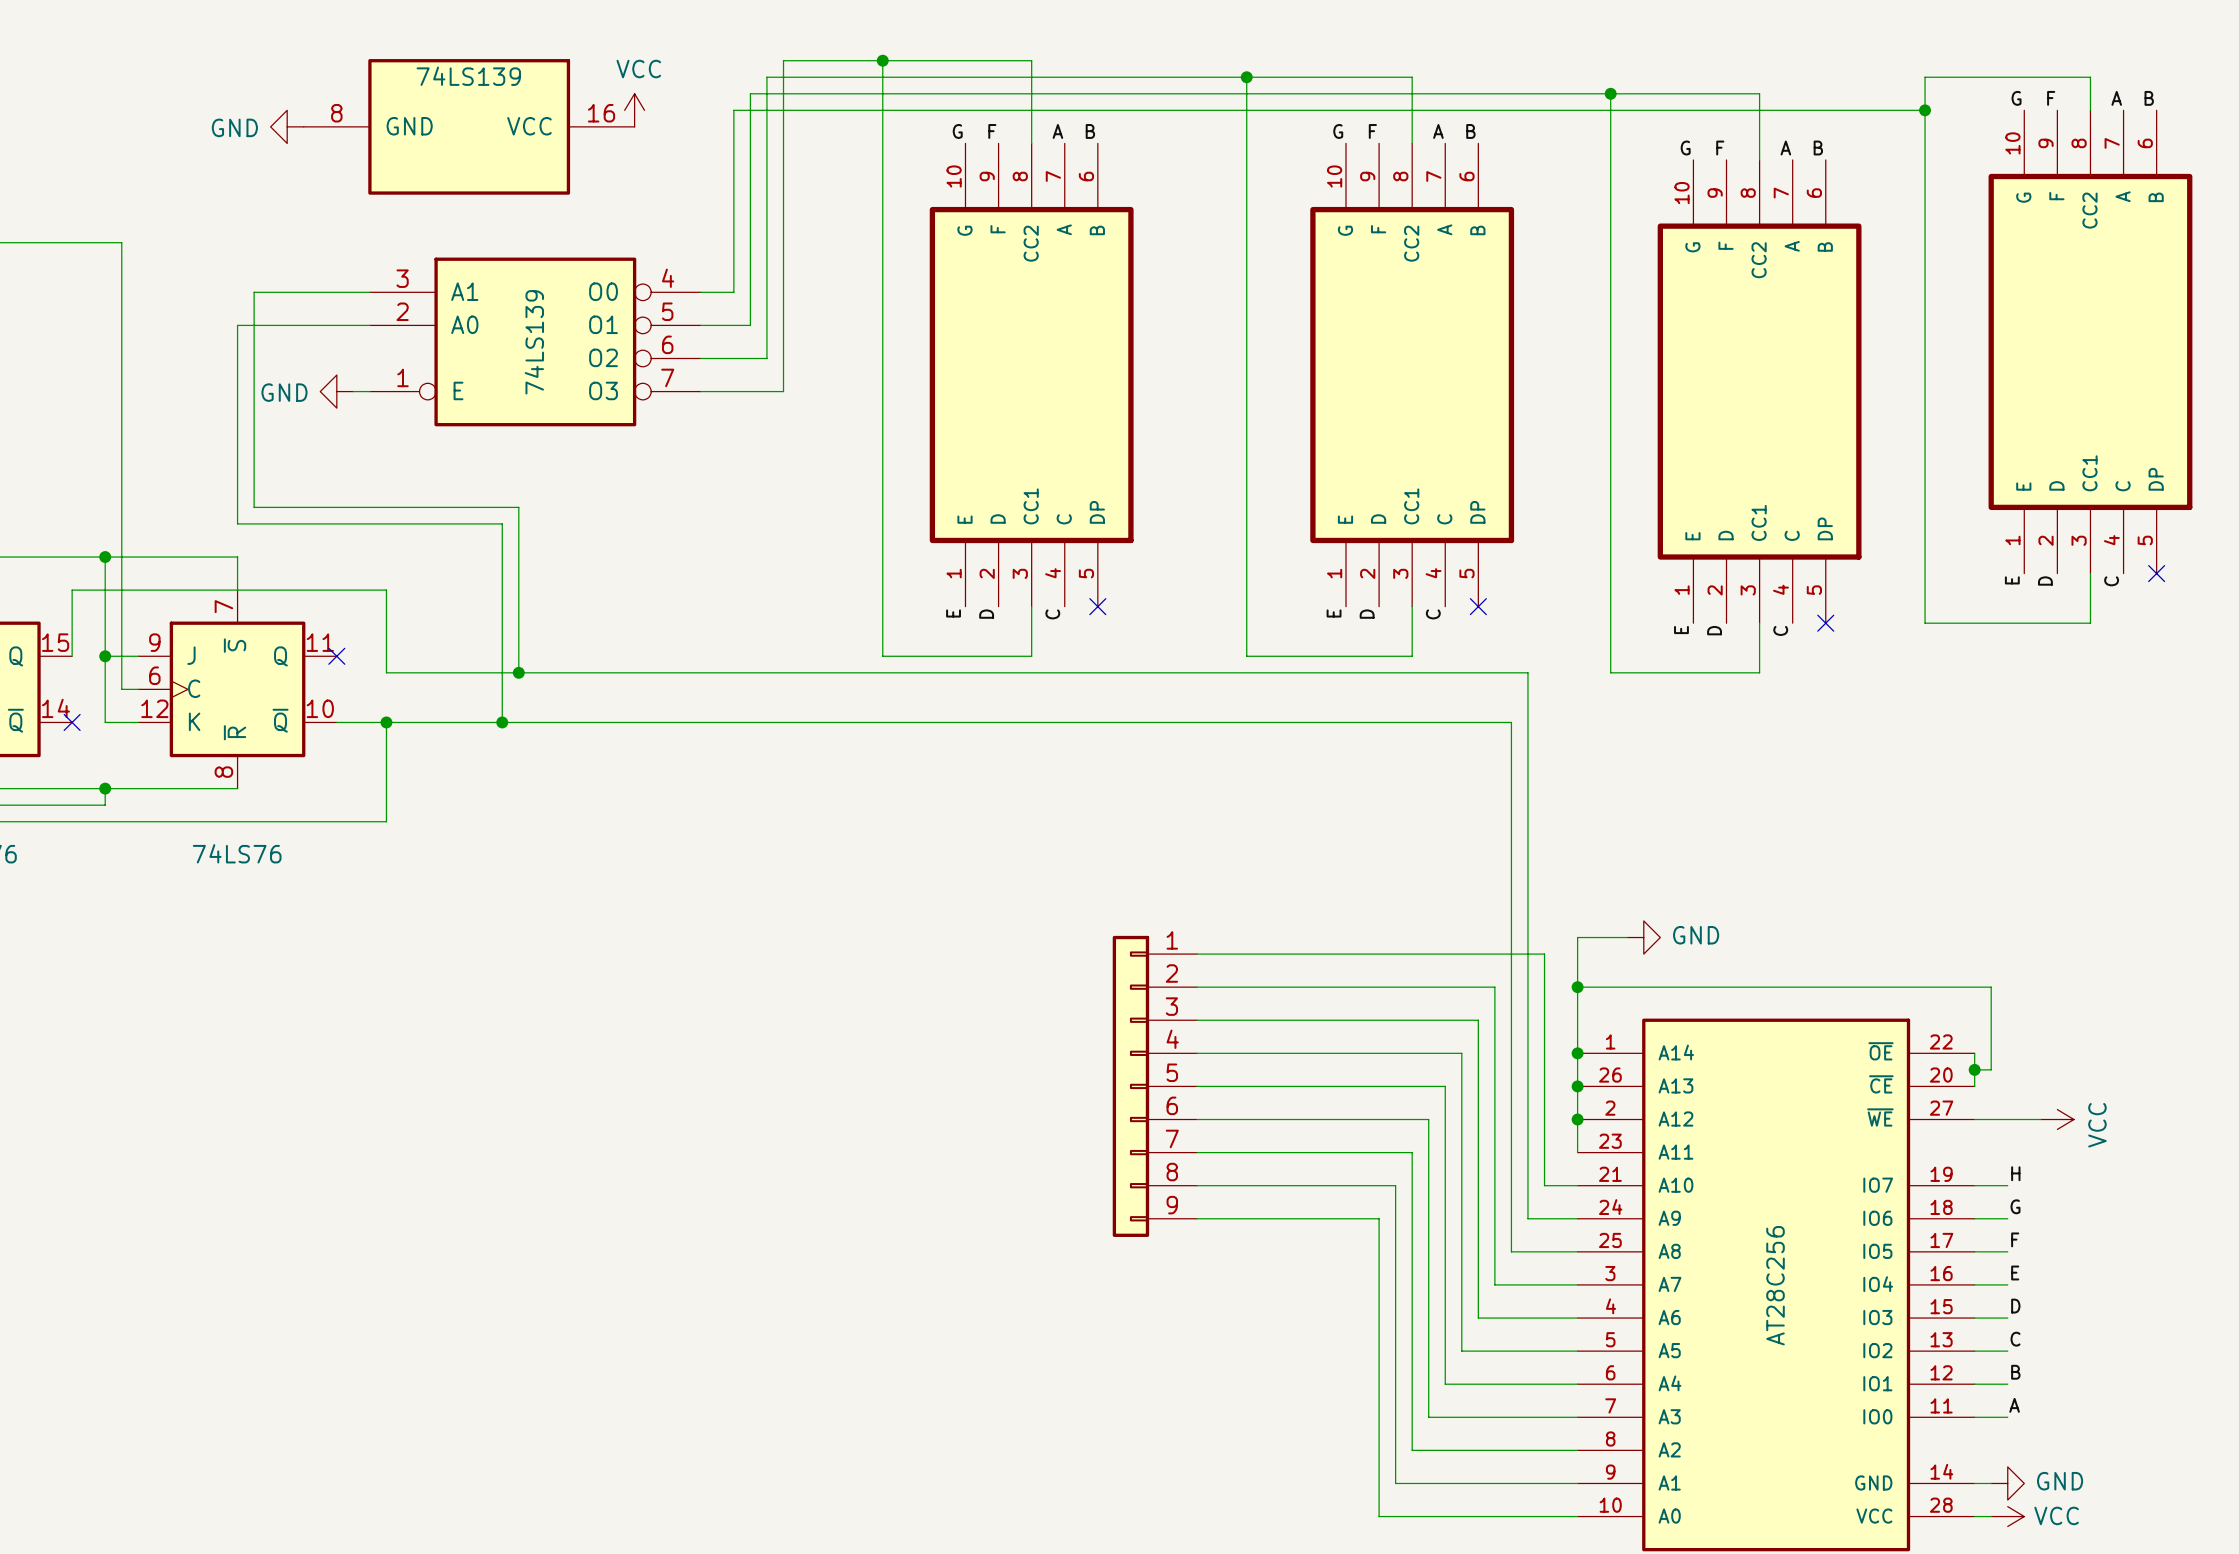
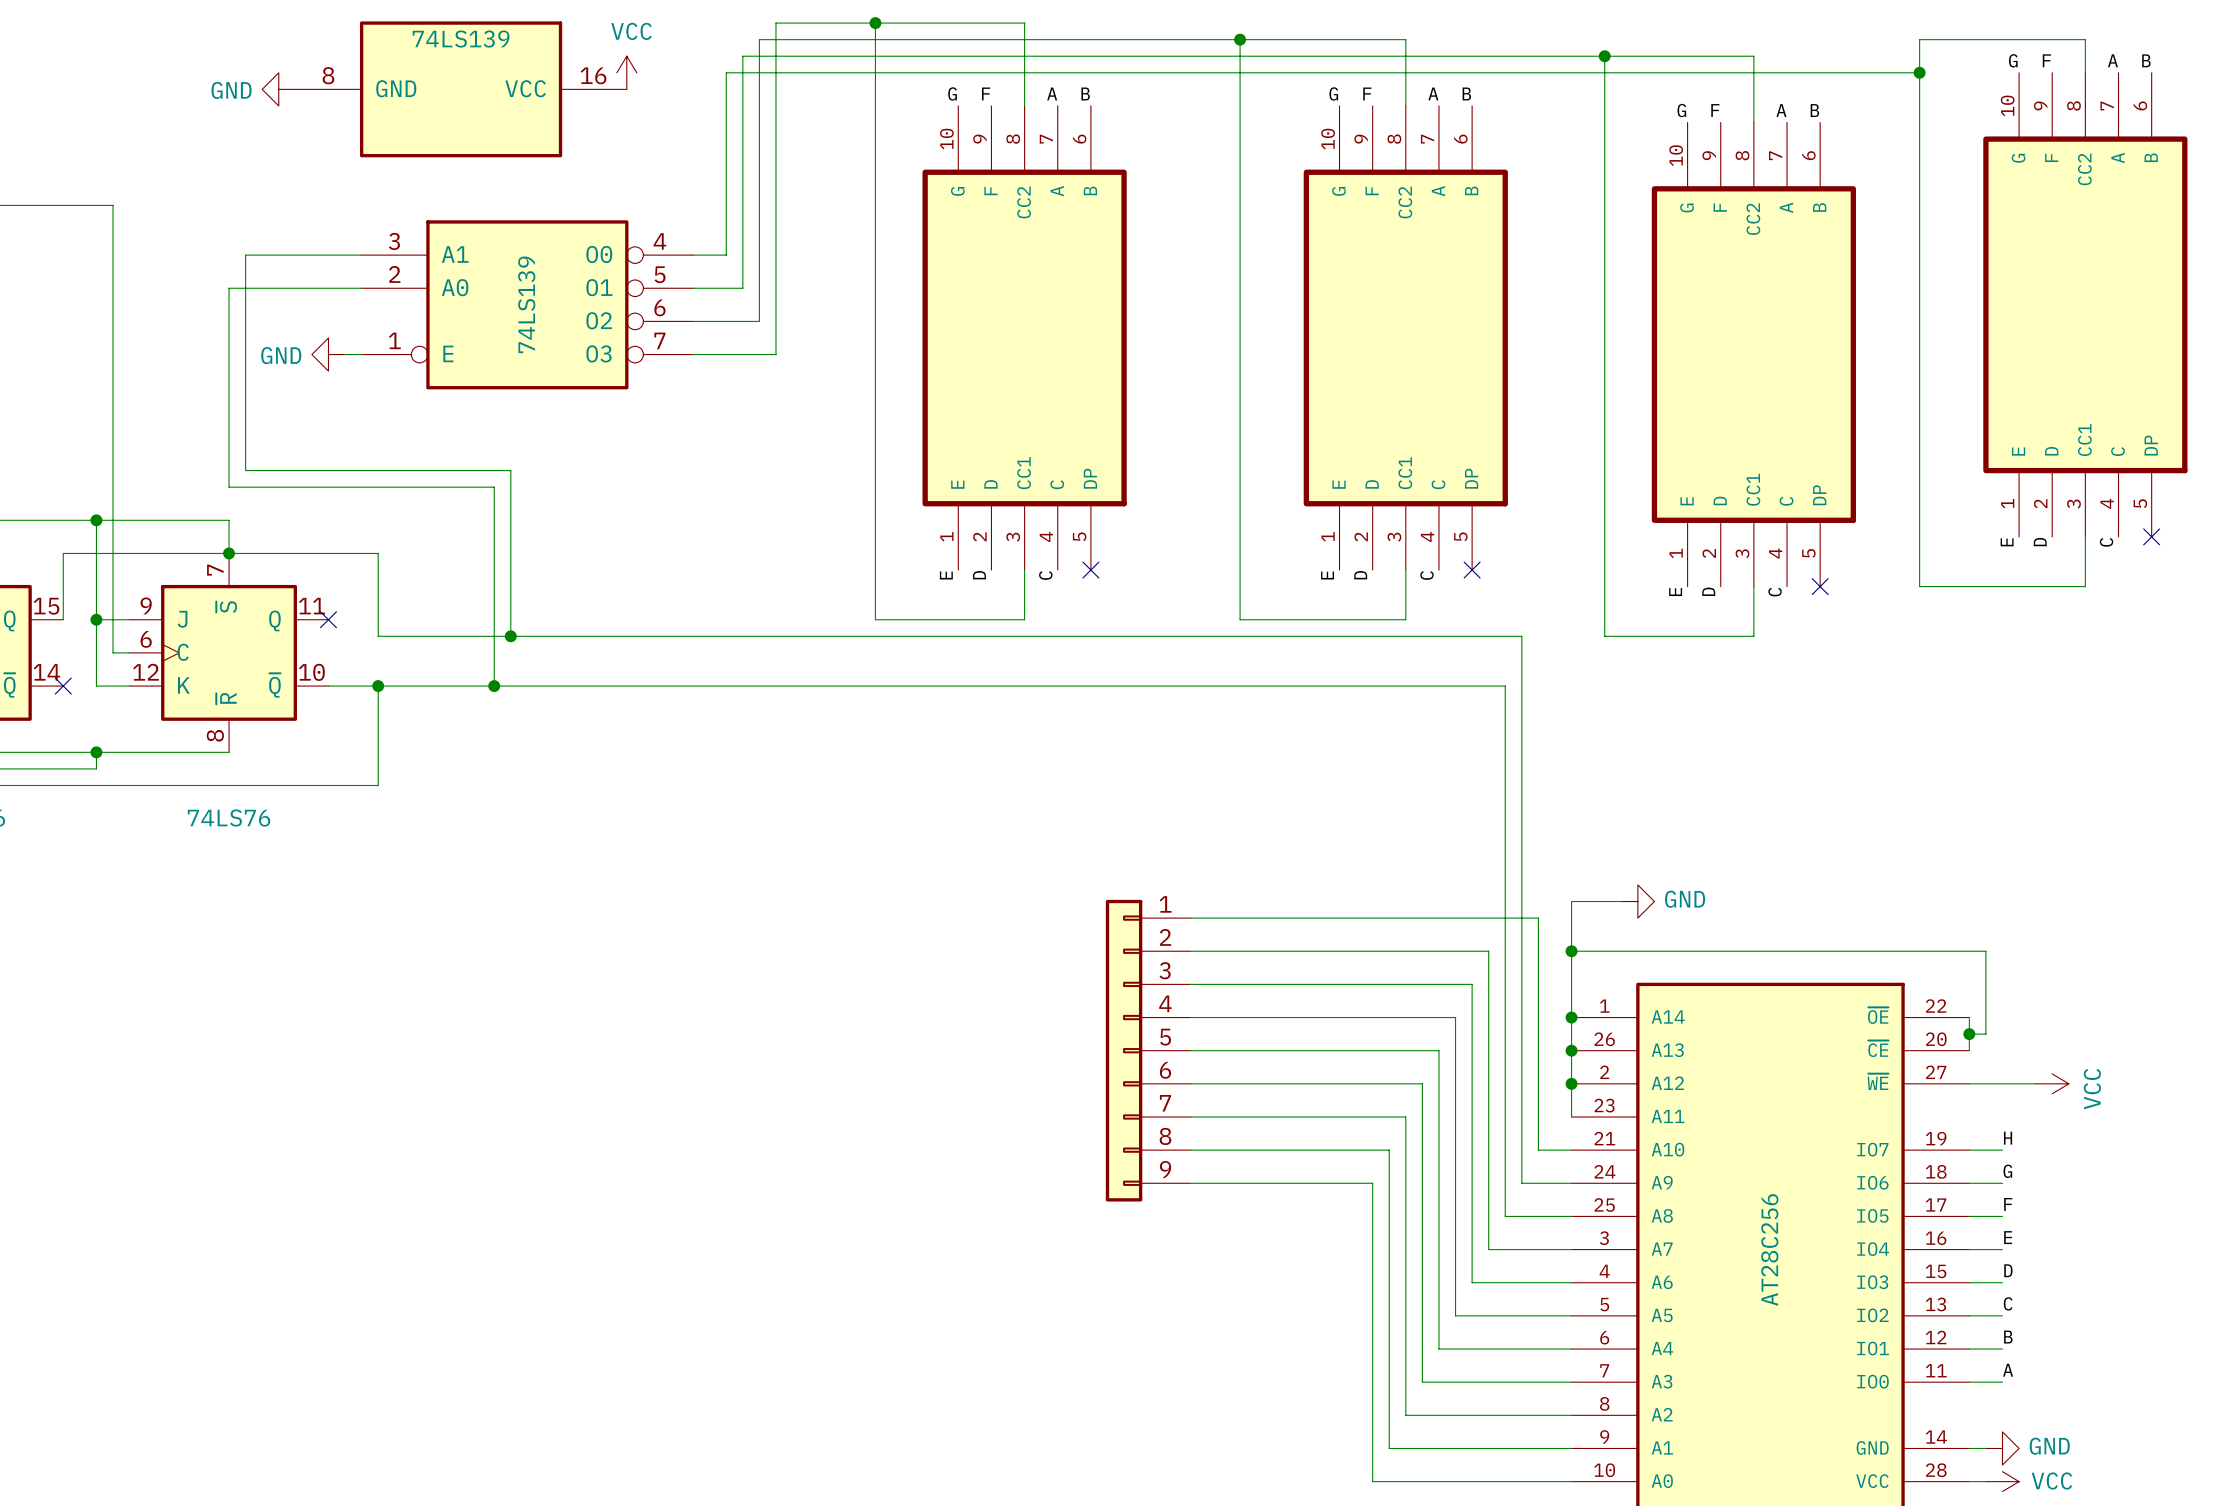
junction: none -> (229, 553)

